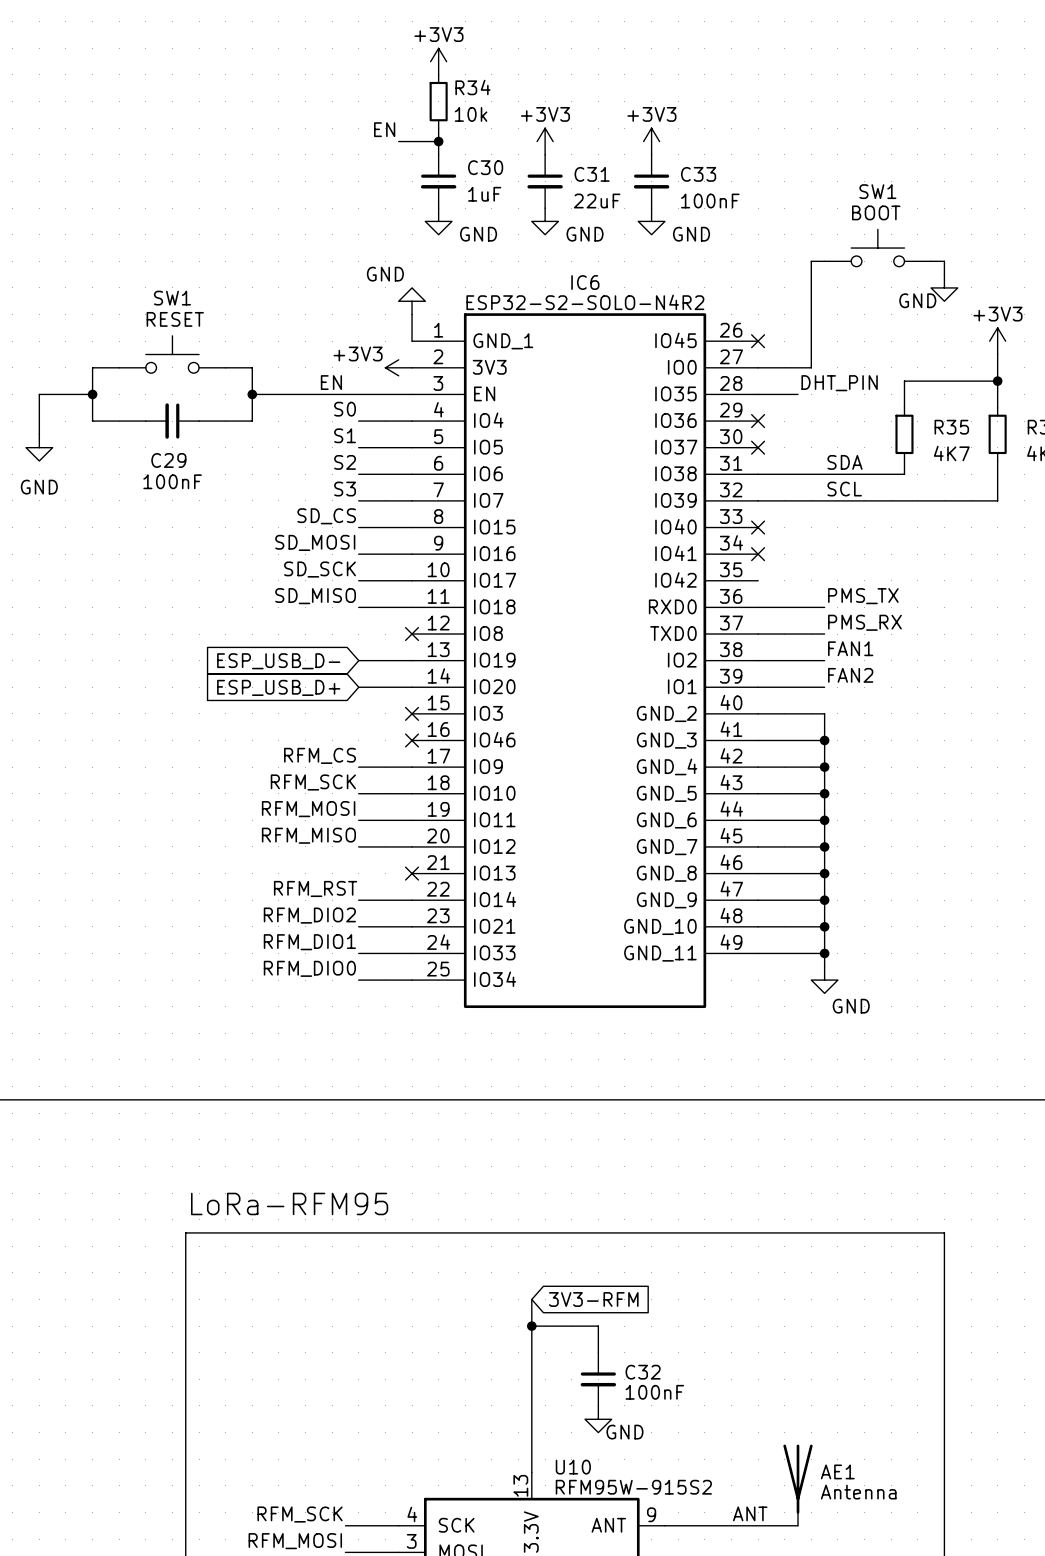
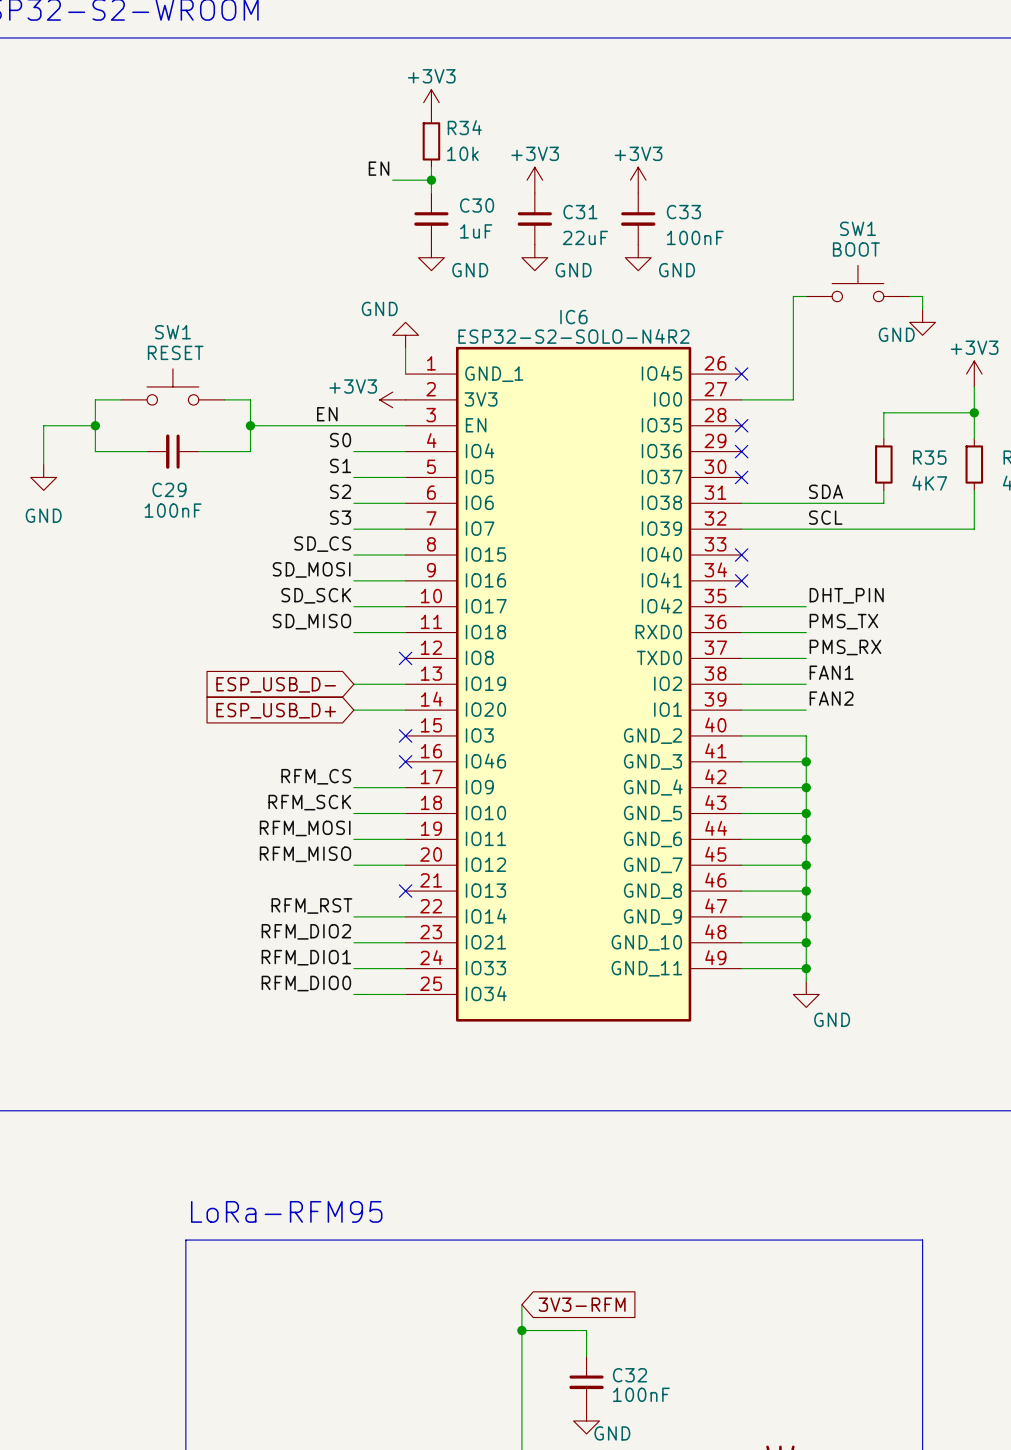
label position: DHT_PIN (839, 383) -> DHT_PIN (846, 595)
wire: (758, 394) (798, 394) -> none
no-connect mark: none -> (741, 425)
wire: none -> (741, 606) (806, 606)

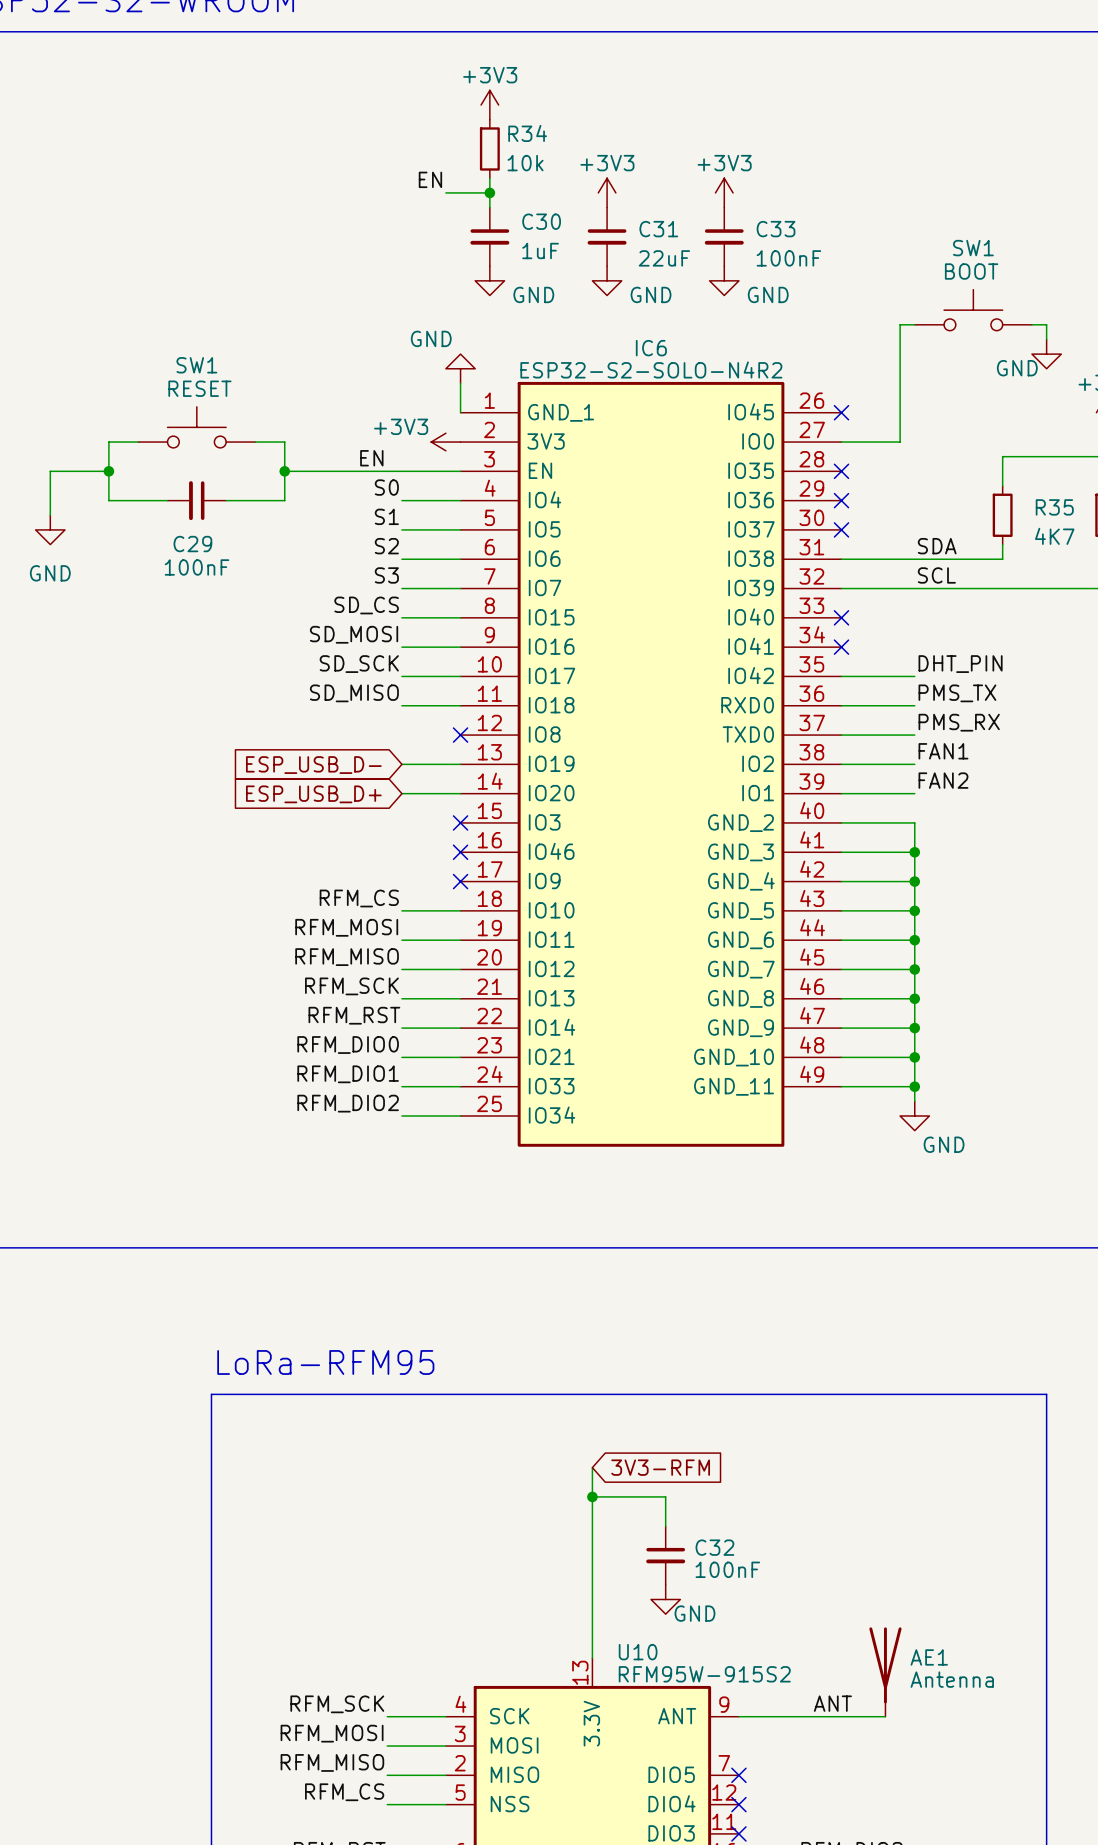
label: RFM_CS (316, 776) -> none
wire: (353, 787) (405, 787) -> (401, 998) (460, 998)
no-connect mark: none -> (460, 881)
label: RFM_SCK (309, 802) -> RFM_CS (359, 898)
label: none -> RFM_SCK (351, 986)
no-connect mark: (405, 891) -> none
label: RFM_DIO2 (306, 931) -> RFM_DIO0 (348, 1045)
label: RFM_DIO0 (306, 983) -> RFM_DIO2 (348, 1103)

